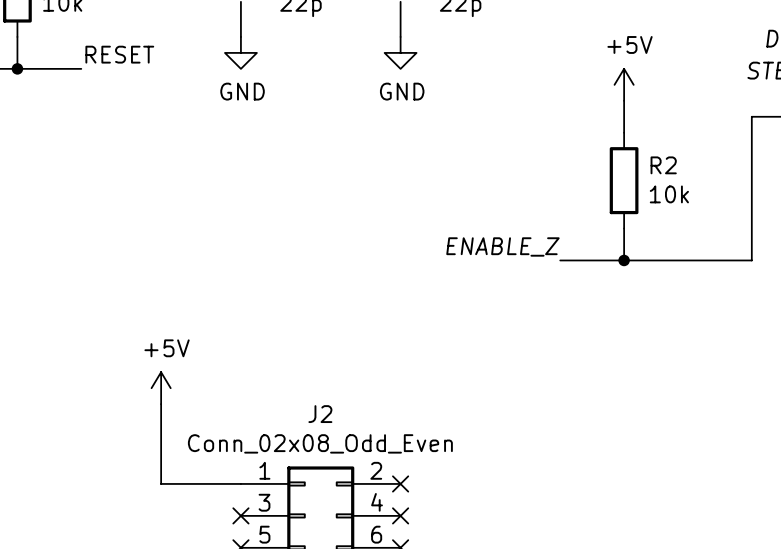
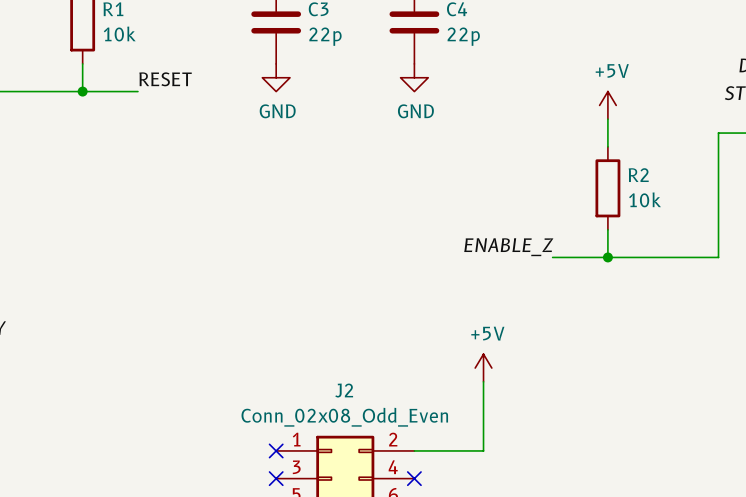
power symbol: +5V (161, 388) -> none
power symbol: none -> +5V (483, 368)
wire: (161, 404) (161, 483) (240, 483) -> none
wire: none -> (483, 381) (483, 450) (414, 450)
no-connect mark: none -> (276, 450)
no-connect mark: (400, 483) -> none

